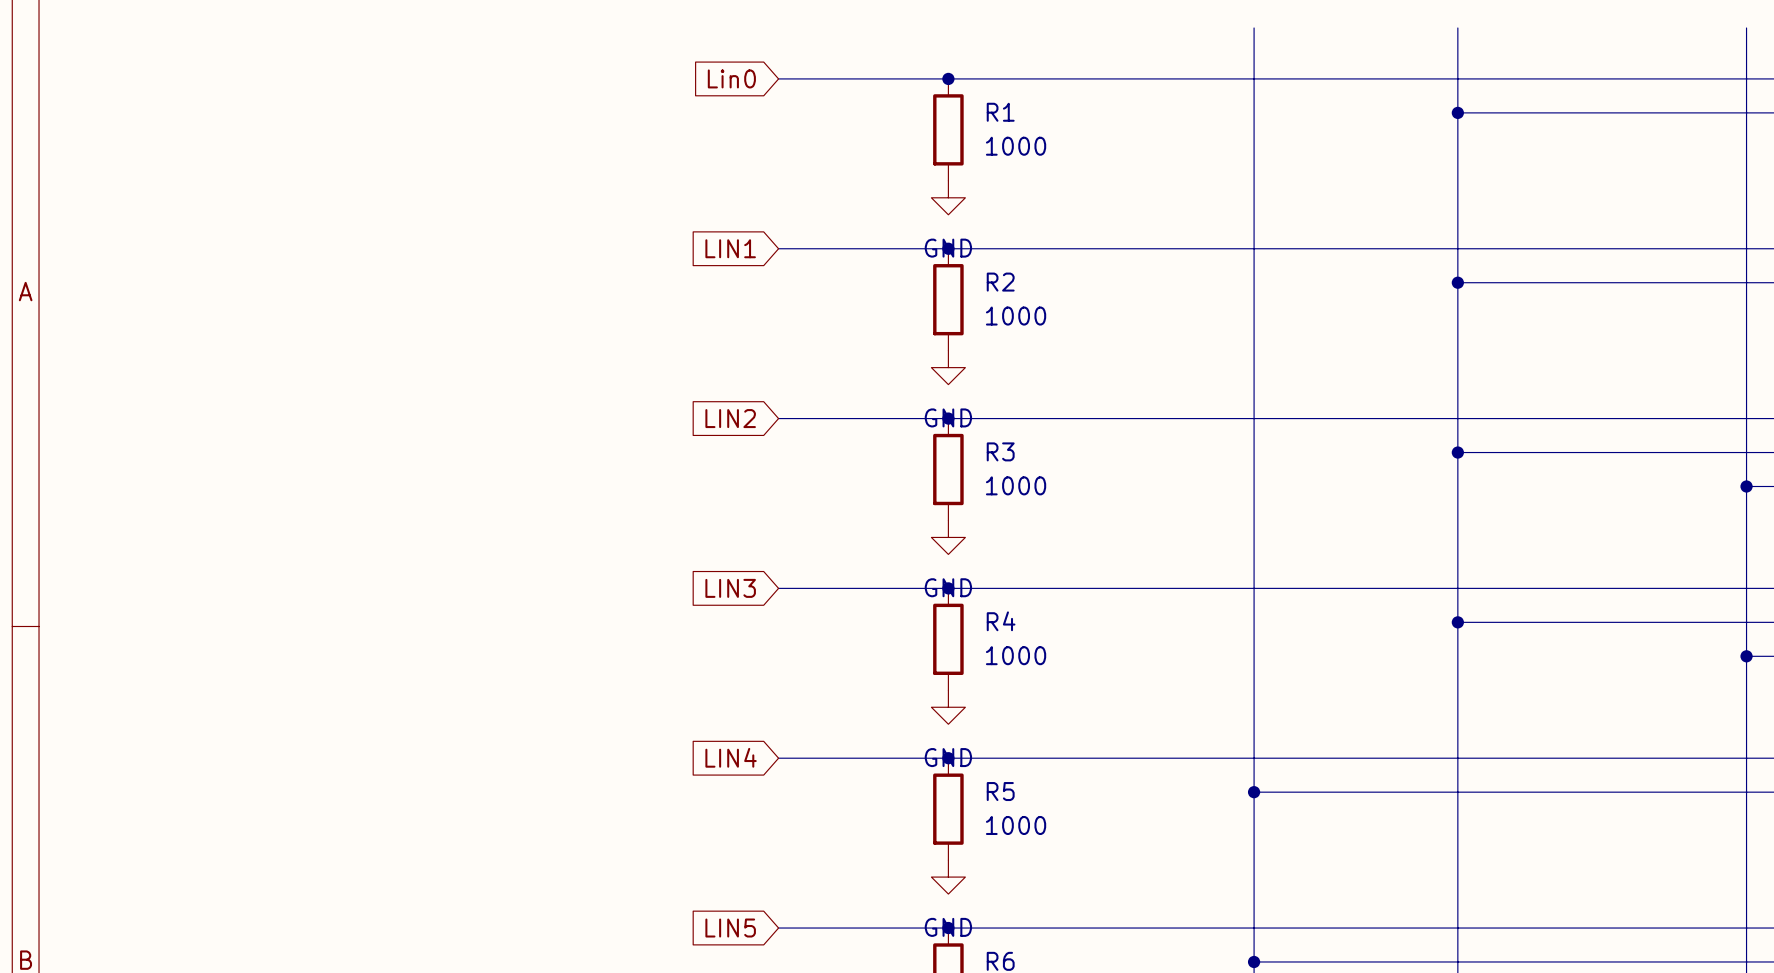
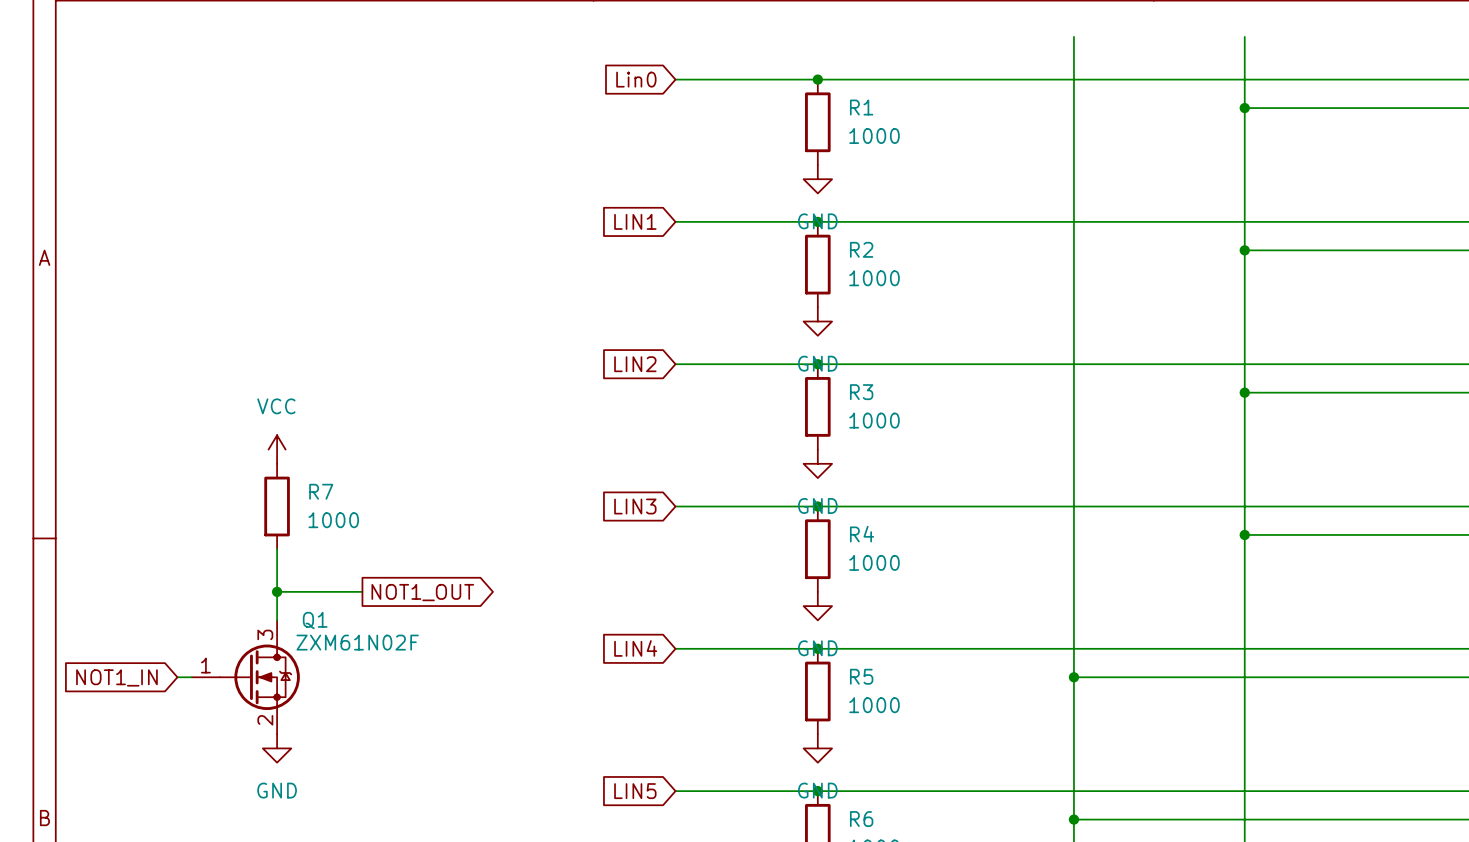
power symbol: none -> VCC (277, 449)
R7: none -> 1000 (277, 506)
wire: none -> (277, 549) (277, 620)
wire: none -> (277, 591) (362, 591)
junction: none -> (277, 591)
global label: none -> NOT1_OUT (422, 592)
global label: none -> NOT1_IN (116, 677)
wire: none -> (177, 677) (191, 677)
Q1: none -> ZXM61N02F (245, 677)
power symbol: none -> GND (277, 748)

